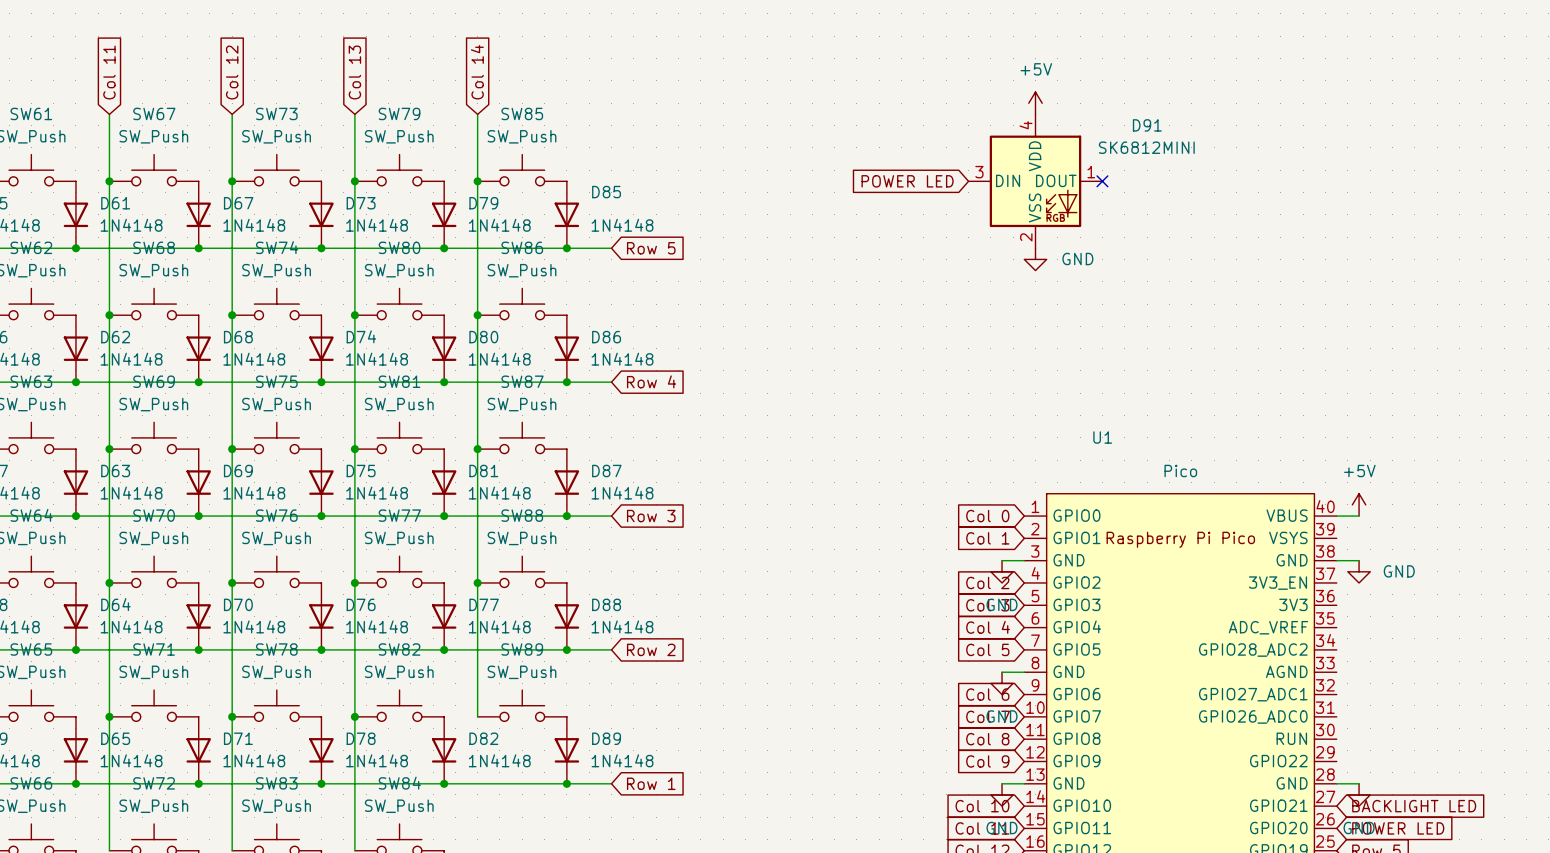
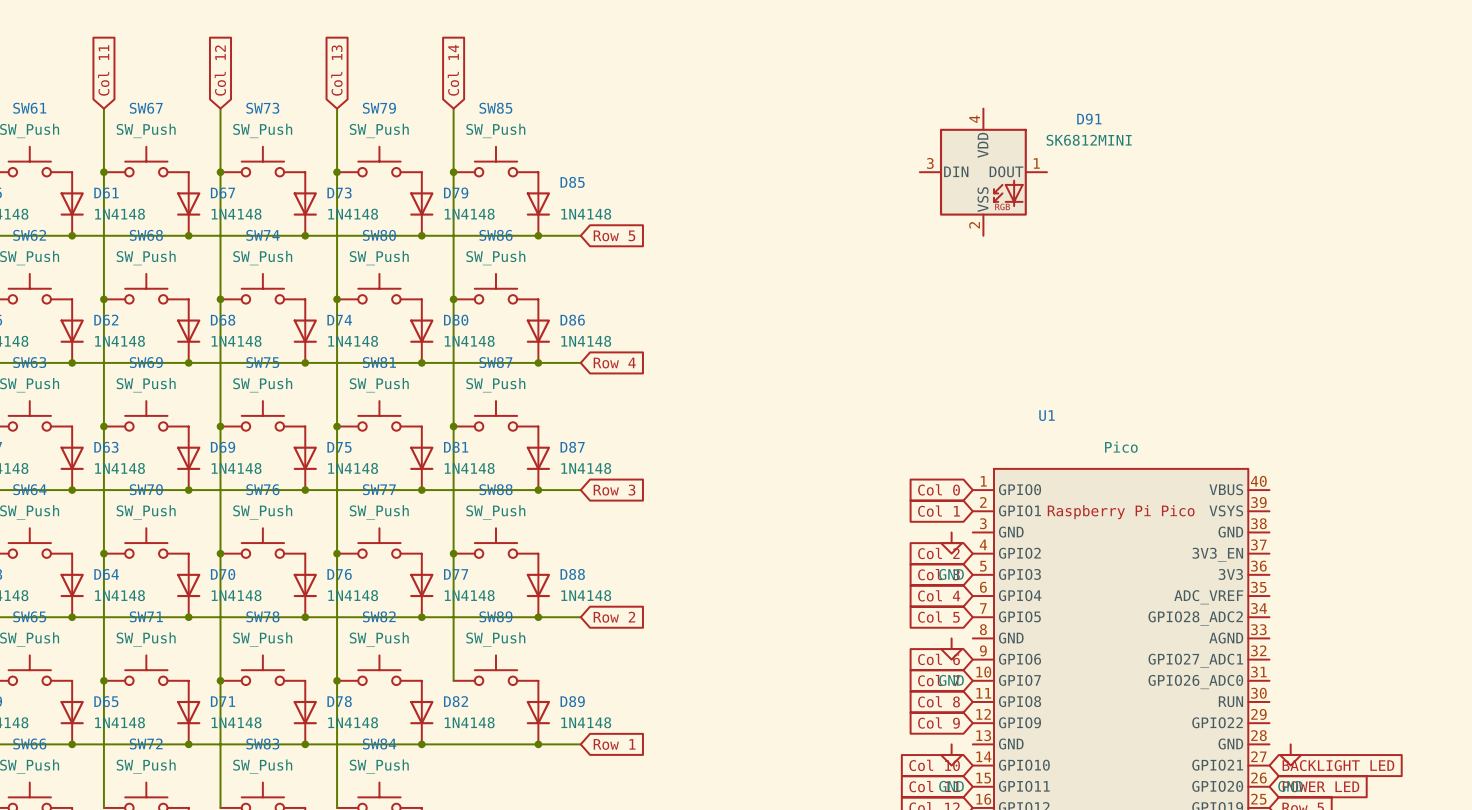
power symbol: +5V (1035, 103) -> none
global label: POWER LED (907, 181) -> none
no-connect mark: (1102, 181) -> none
power symbol: GND (1035, 259) -> none
power symbol: +5V (1359, 504) -> none
wire: (1336, 516) (1359, 516) -> none
wire: (1002, 560) (1024, 560) -> none
wire: (1336, 560) (1359, 560) -> none
power symbol: GND (1359, 571) -> none
wire: (1002, 672) (1024, 672) -> none
wire: (1002, 783) (1024, 783) -> none
wire: (1336, 783) (1359, 783) -> none

